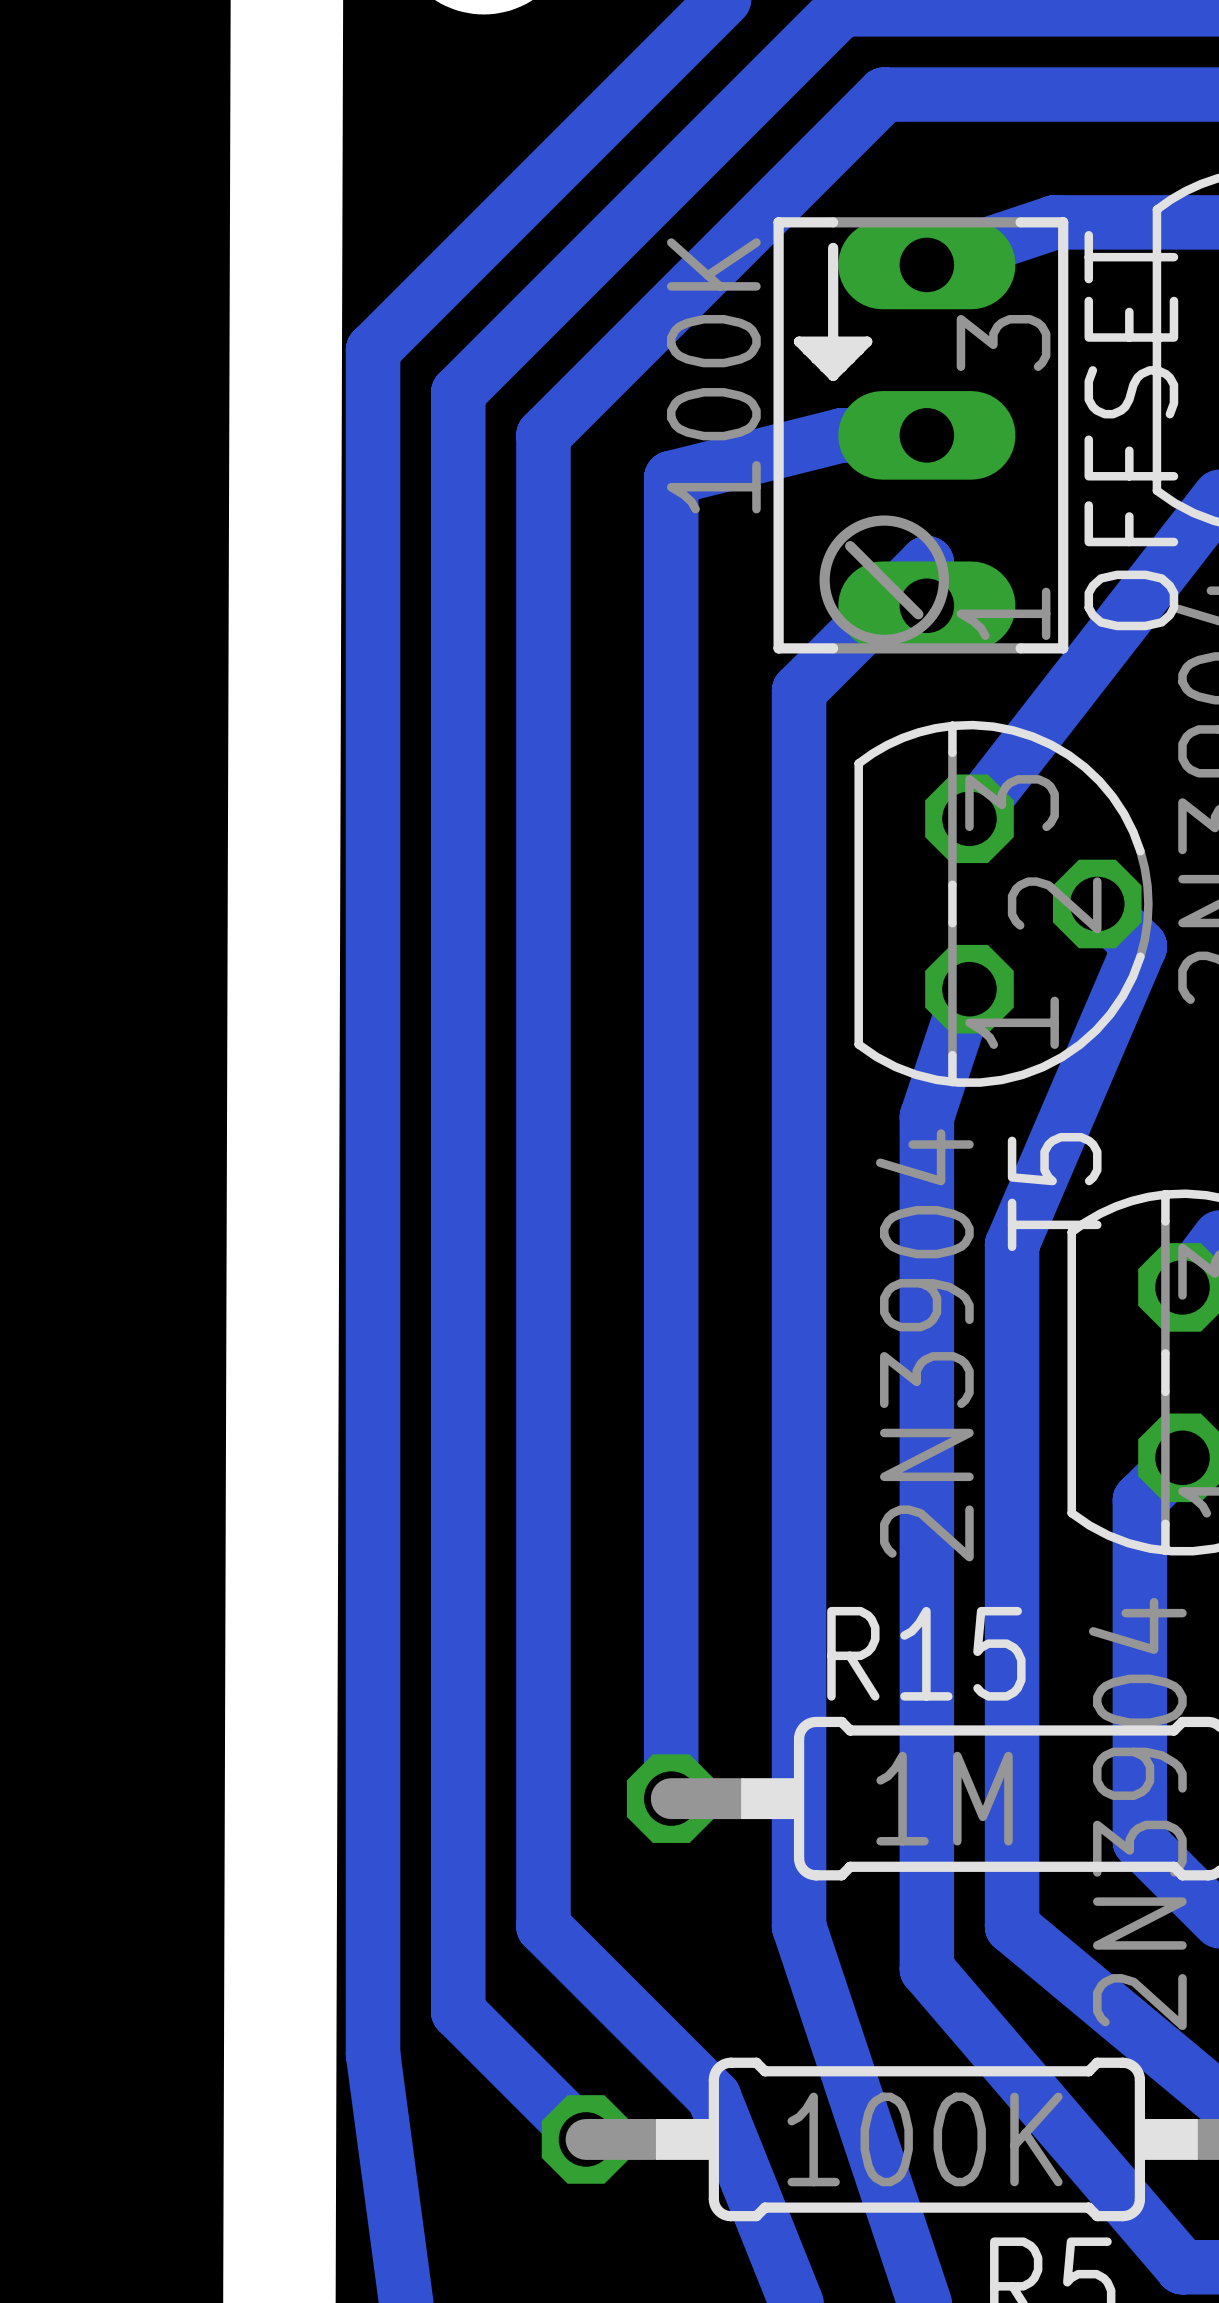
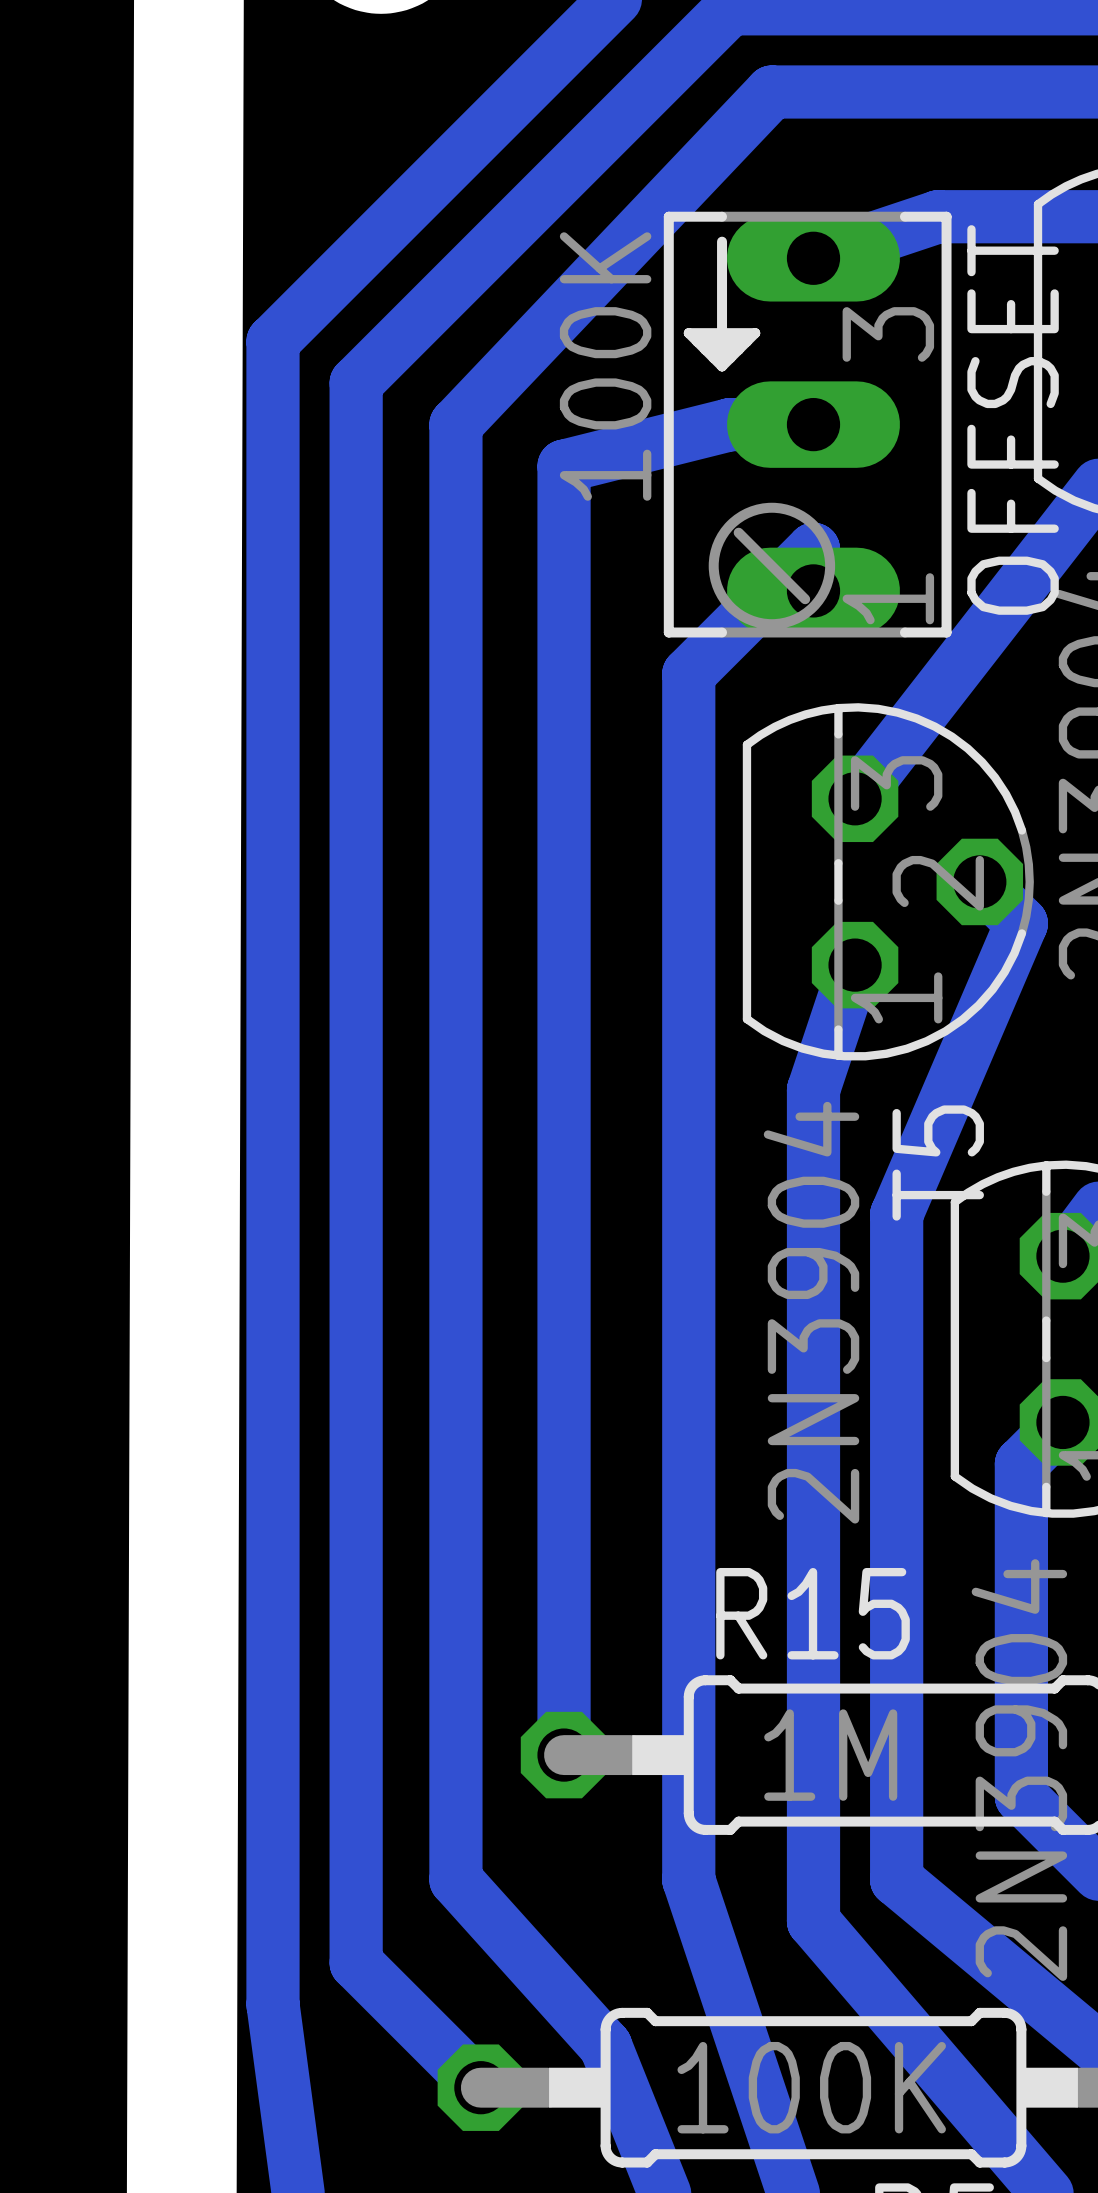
bottom track: (884, 94) (543, 435) (543, 1926) (713, 2096) -> (771, 91) (455, 424) (455, 1879) (605, 2046)

